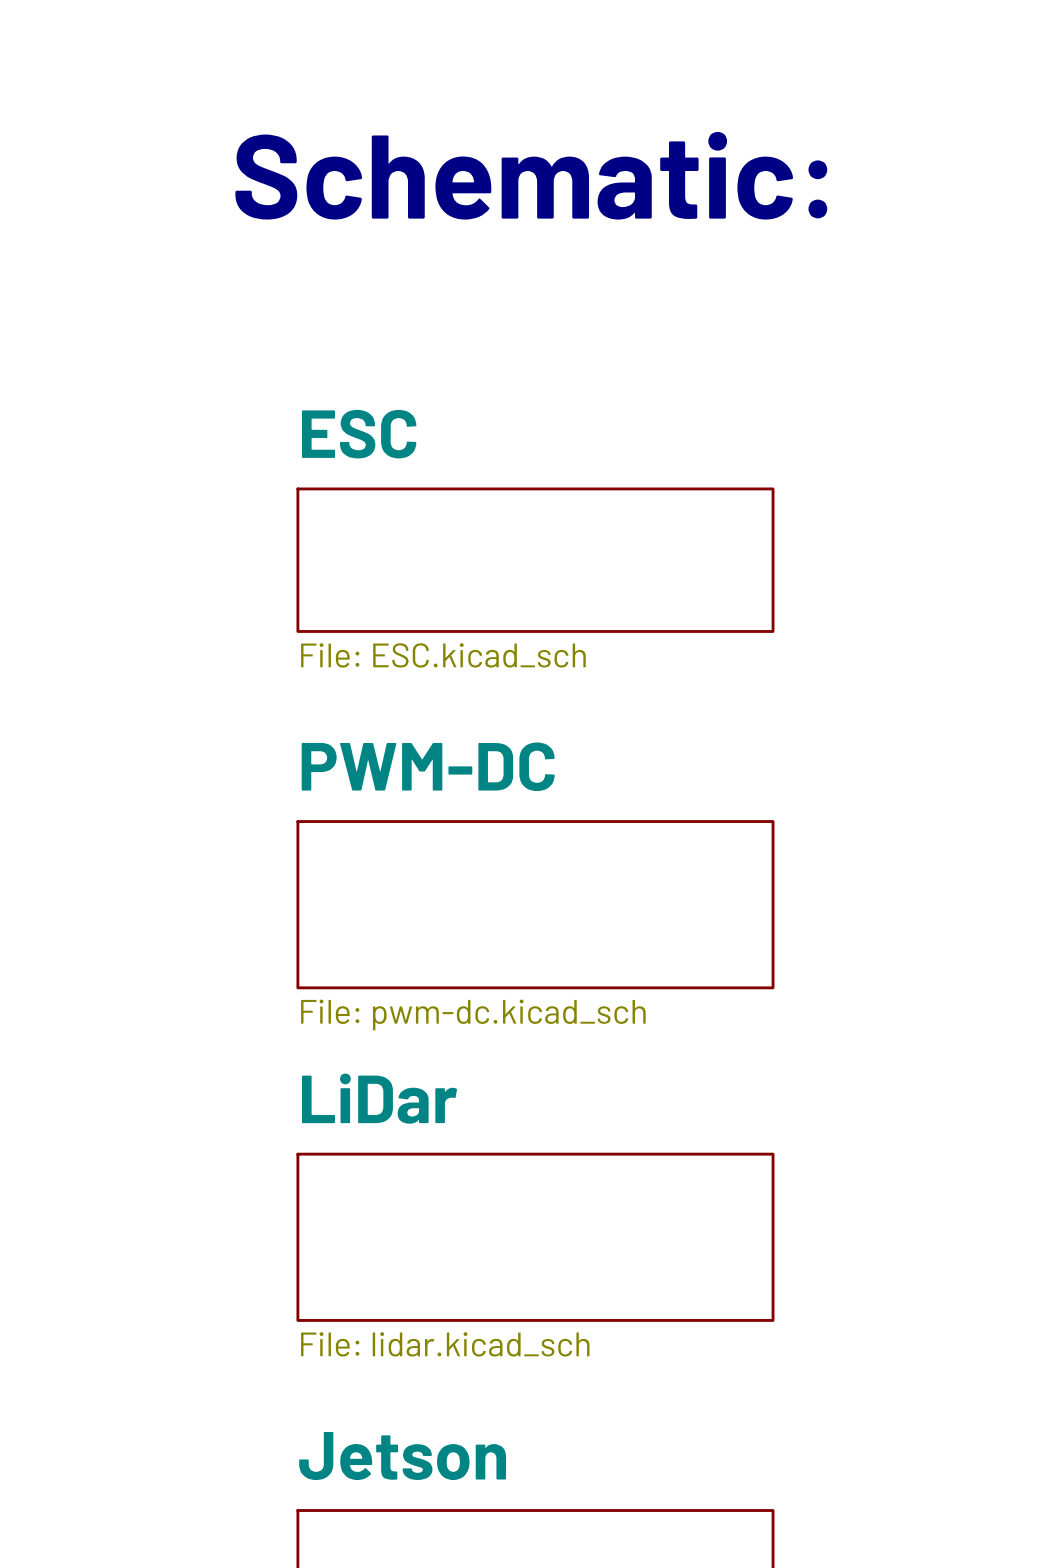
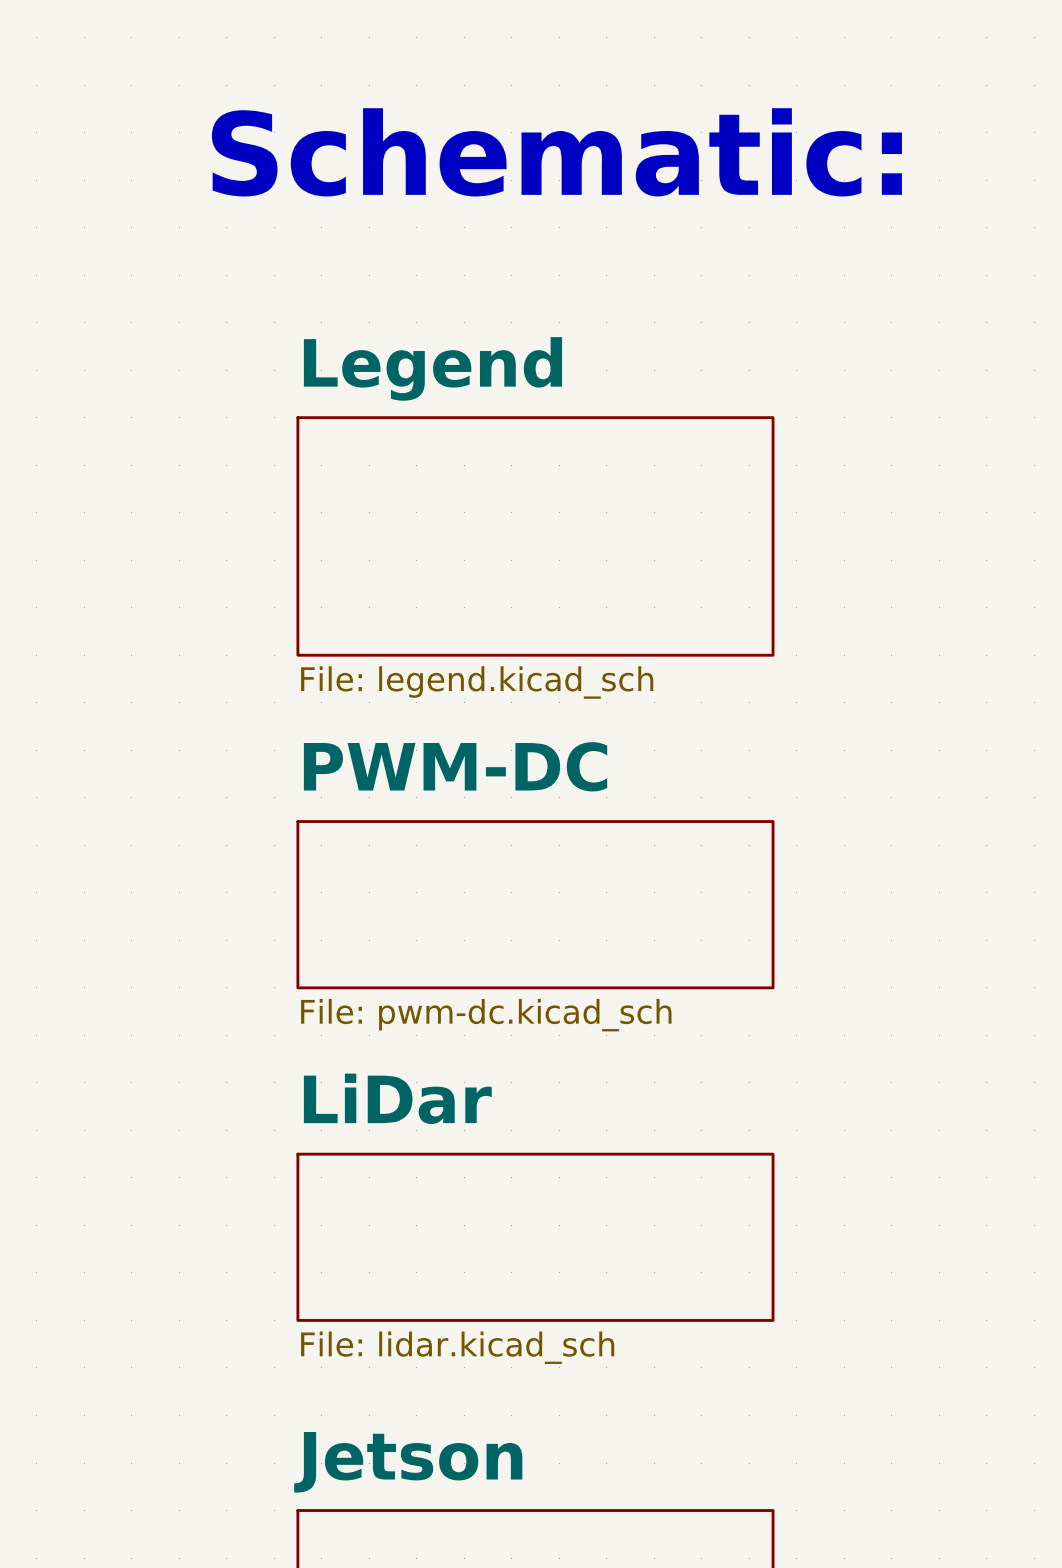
text position: Schematic: (531, 175) -> Schematic: (556, 152)
sheet Legend: none -> File: legend.kicad_sch (535, 536)
sheet ESC: File: ESC.kicad_sch (535, 560) -> none

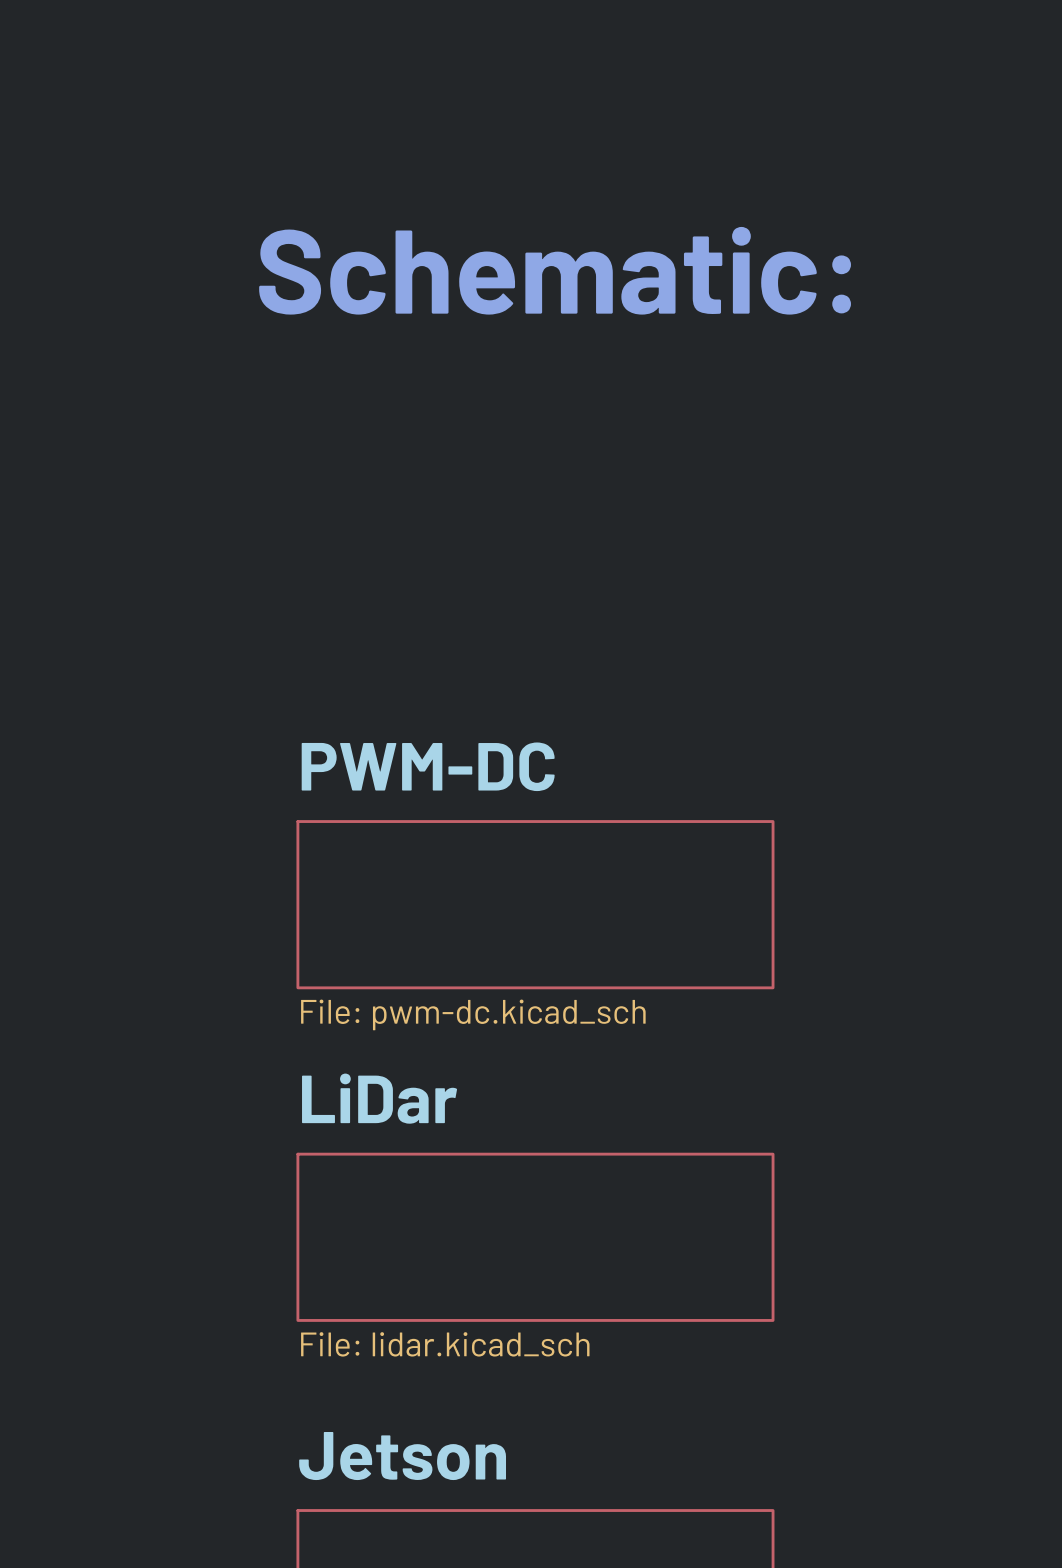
text position: Schematic: (556, 152) -> Schematic: (555, 270)
sheet Legend: File: legend.kicad_sch (535, 536) -> none

